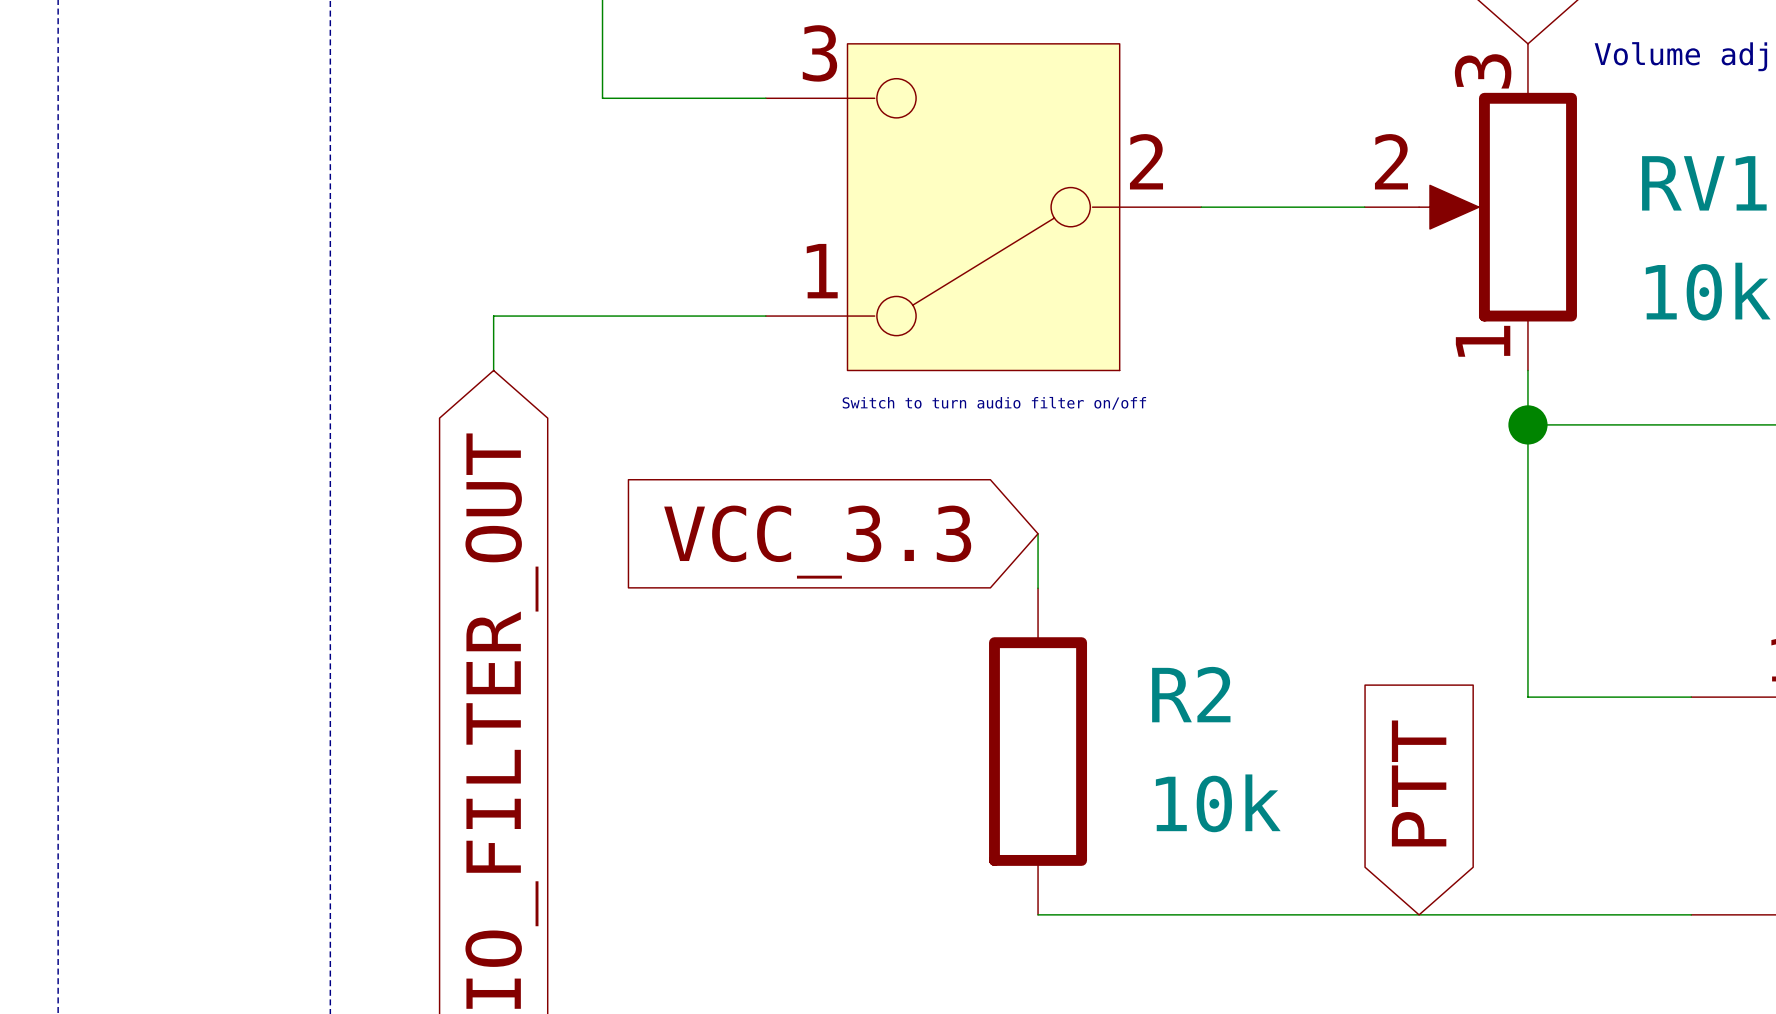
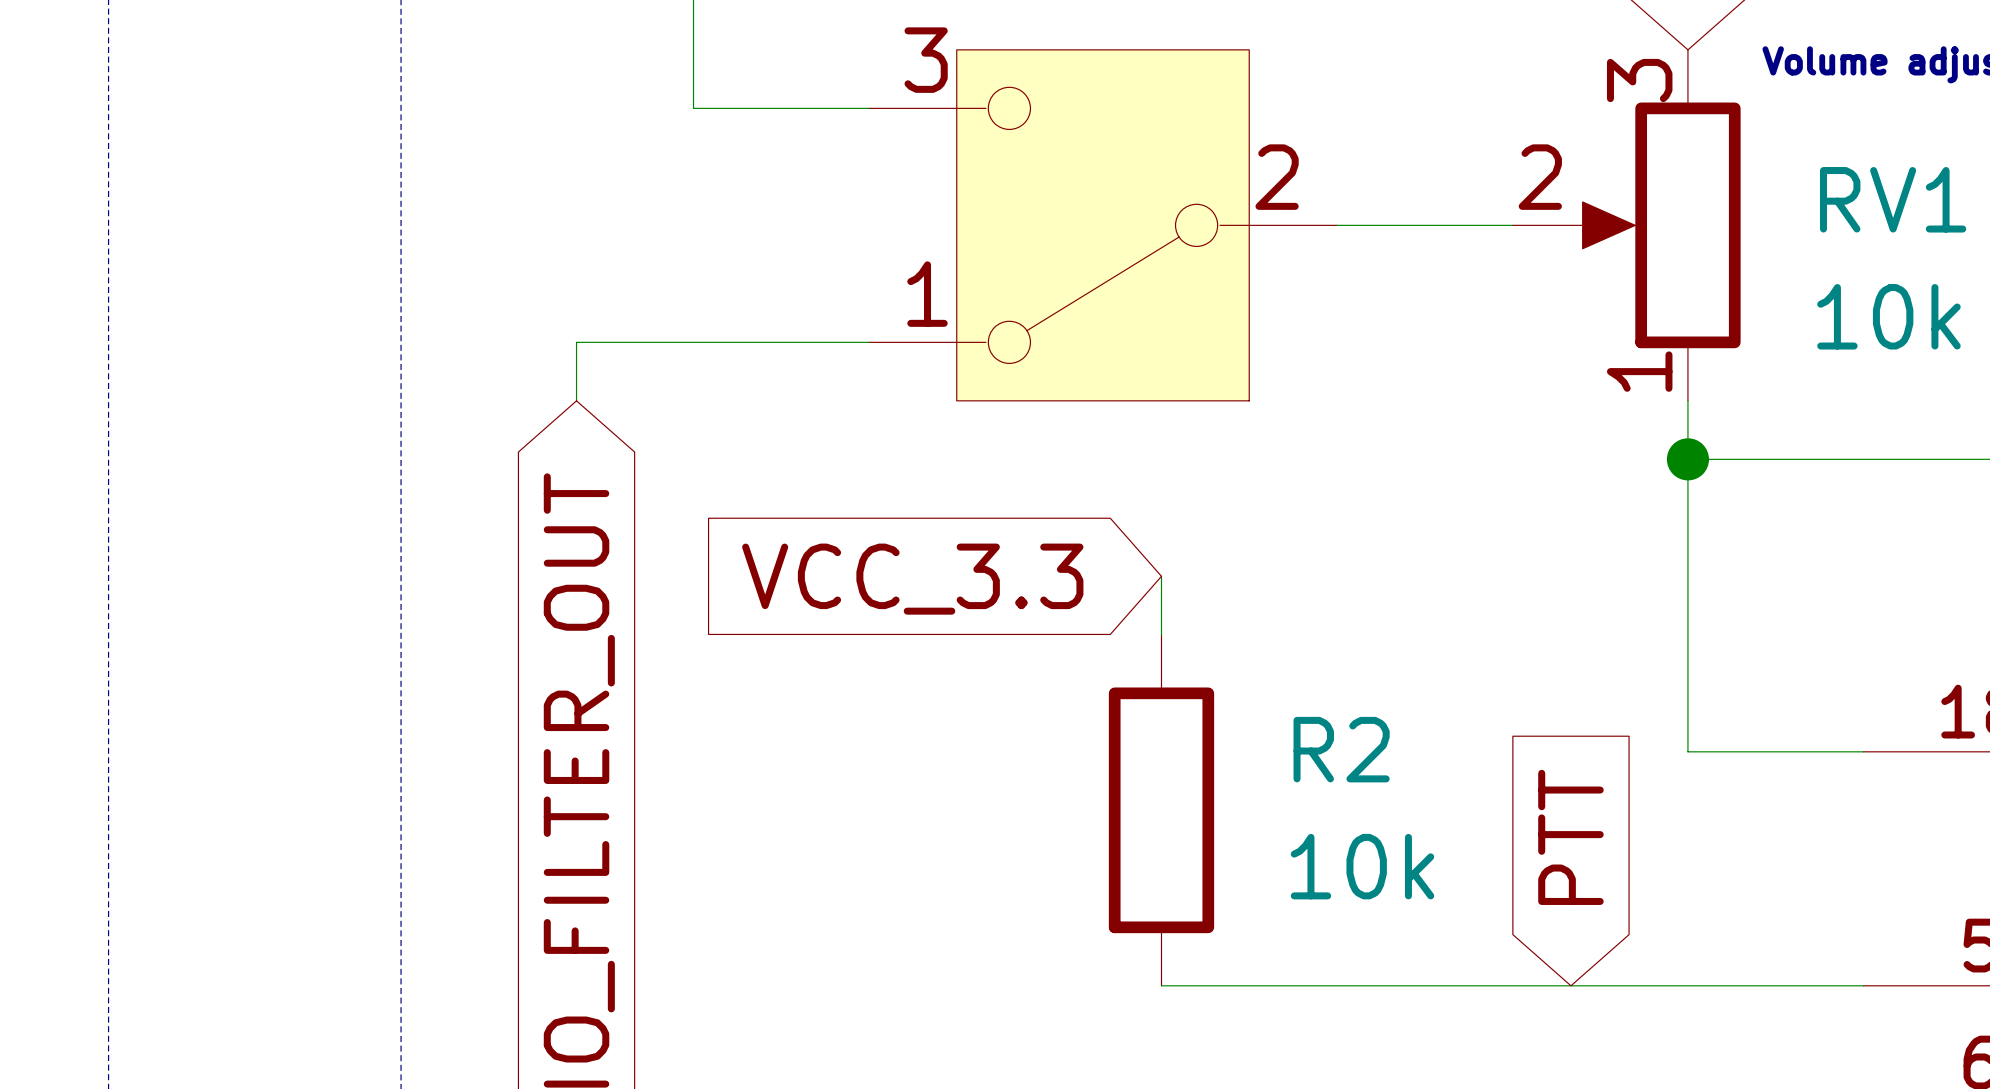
text: Switch to turn audio filter on/off (994, 403) -> none

